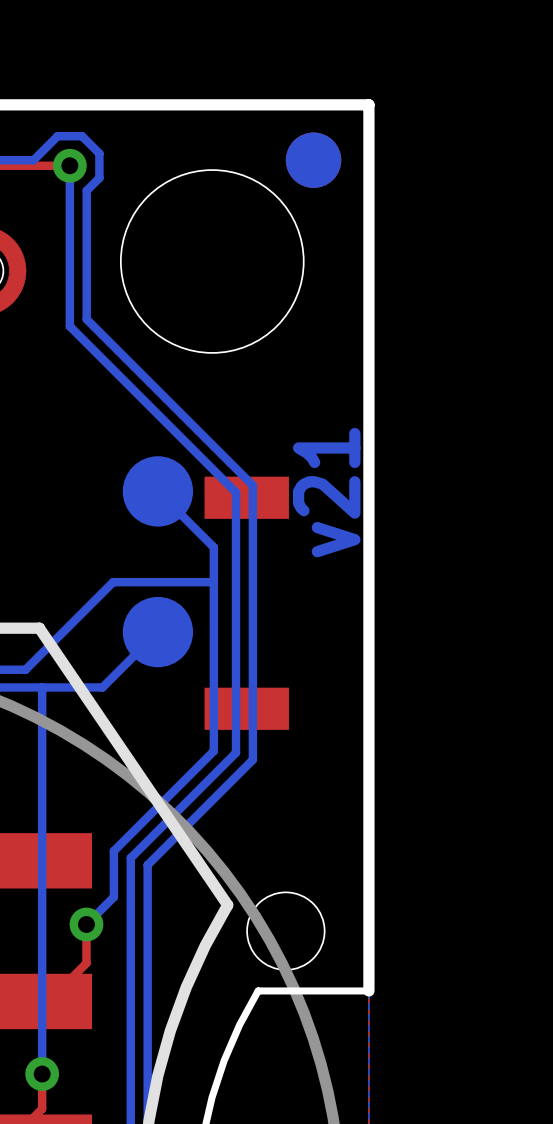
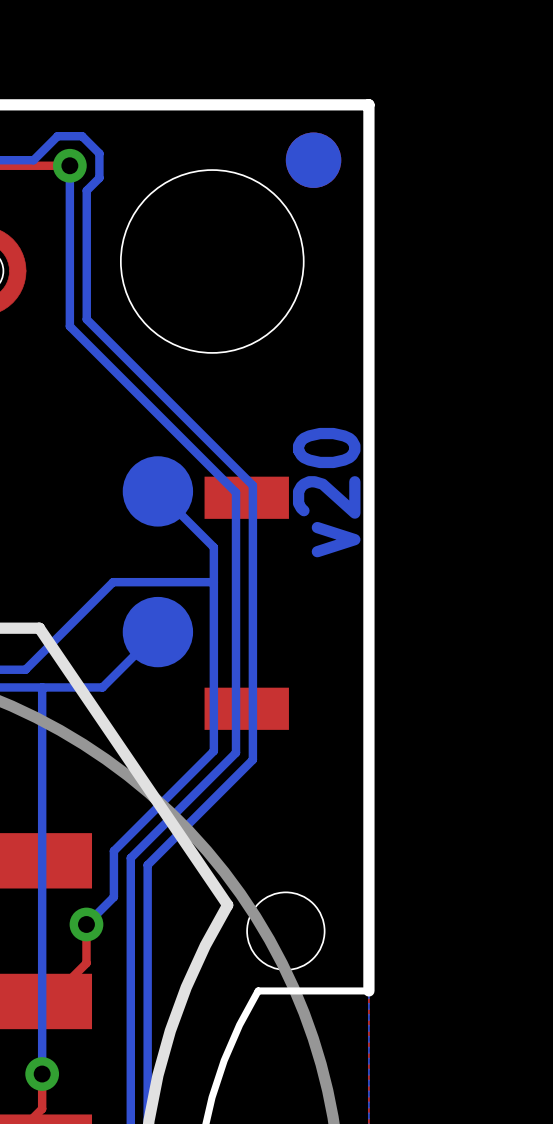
text: v21 (326, 492) -> v20 (326, 492)

